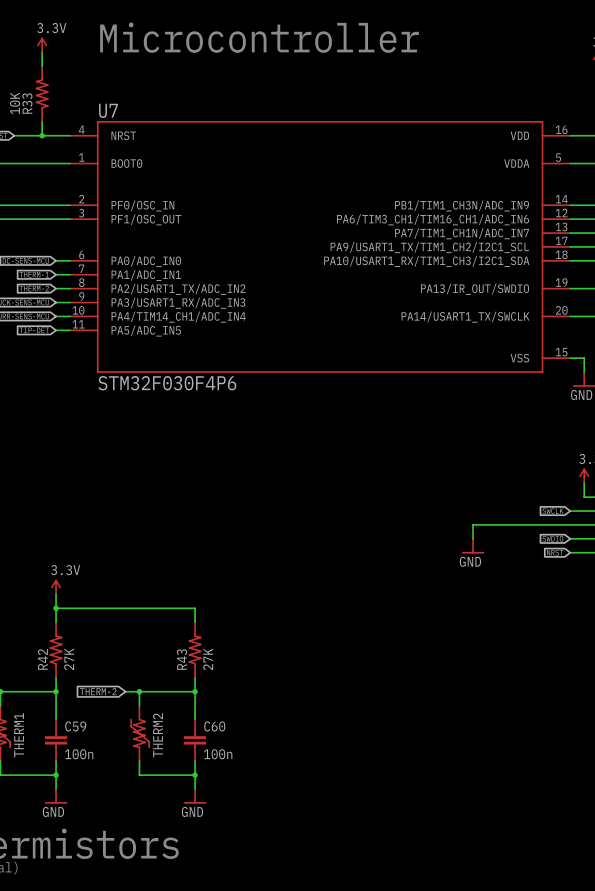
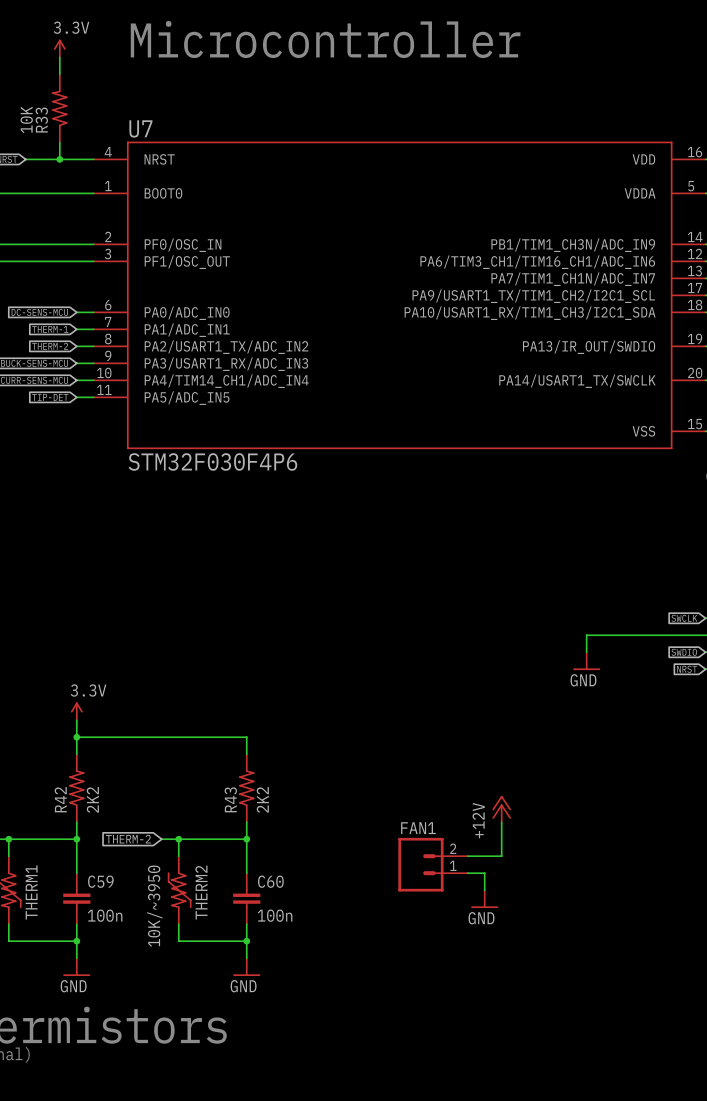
R42 value: 27K (69, 659) -> 2K2 (92, 799)
R43 value: 27K (208, 659) -> 2K2 (262, 799)
power symbol: none -> +12V (501, 809)
wire: none -> (501, 822) (501, 856) (467, 856)
FAN1: none -> (433, 864)
wire: none -> (467, 873) (484, 873) (484, 890)
power symbol: none -> GND (484, 899)
THERM2 value: none -> 10K/~3950 (154, 906)

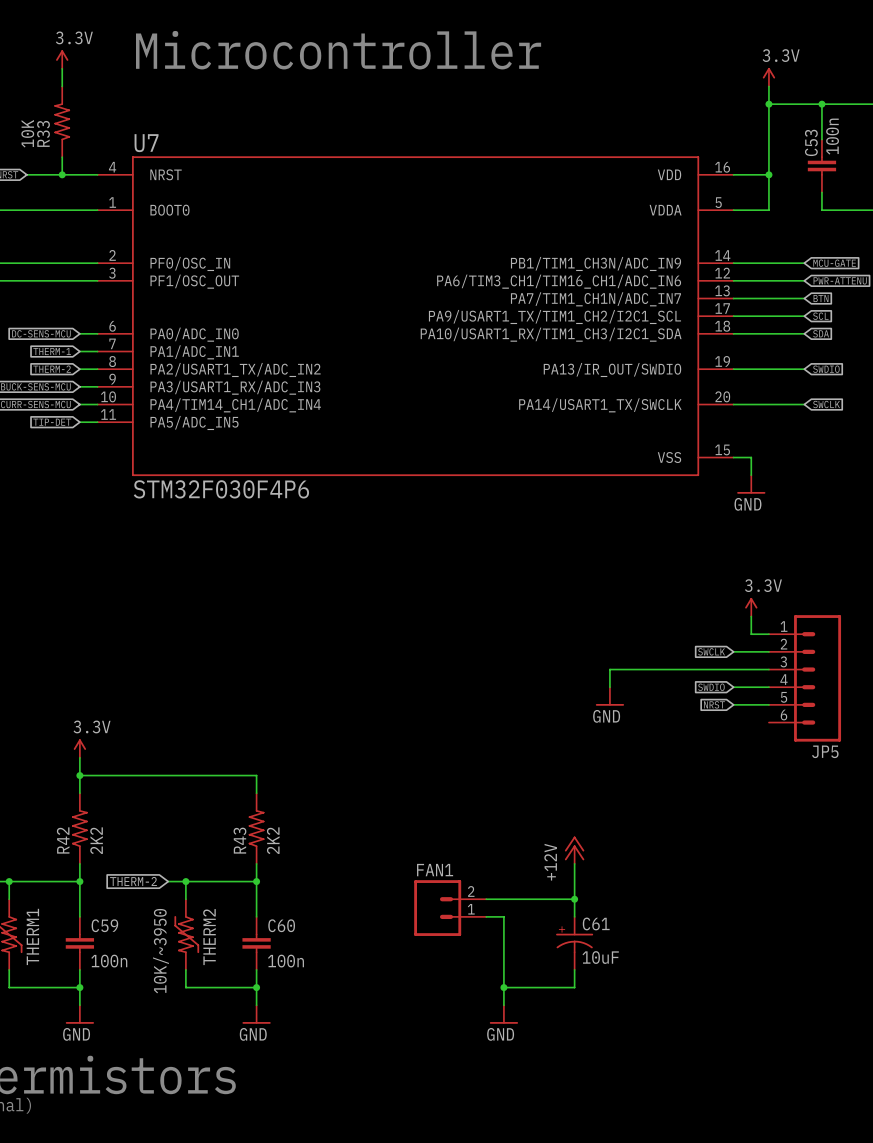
power symbol position: +12V (501, 809) -> +12V (574, 850)
wire: (501, 822) (501, 856) -> (574, 899) (521, 899)
wire: none -> (574, 863) (574, 916)
junction: none -> (574, 899)
wire: none -> (503, 934) (503, 1005)
C61: none -> 10uF (574, 943)
power symbol position: GND (484, 899) -> GND (503, 1014)
wire: none -> (574, 969) (574, 987) (503, 987)
junction: none -> (503, 987)

